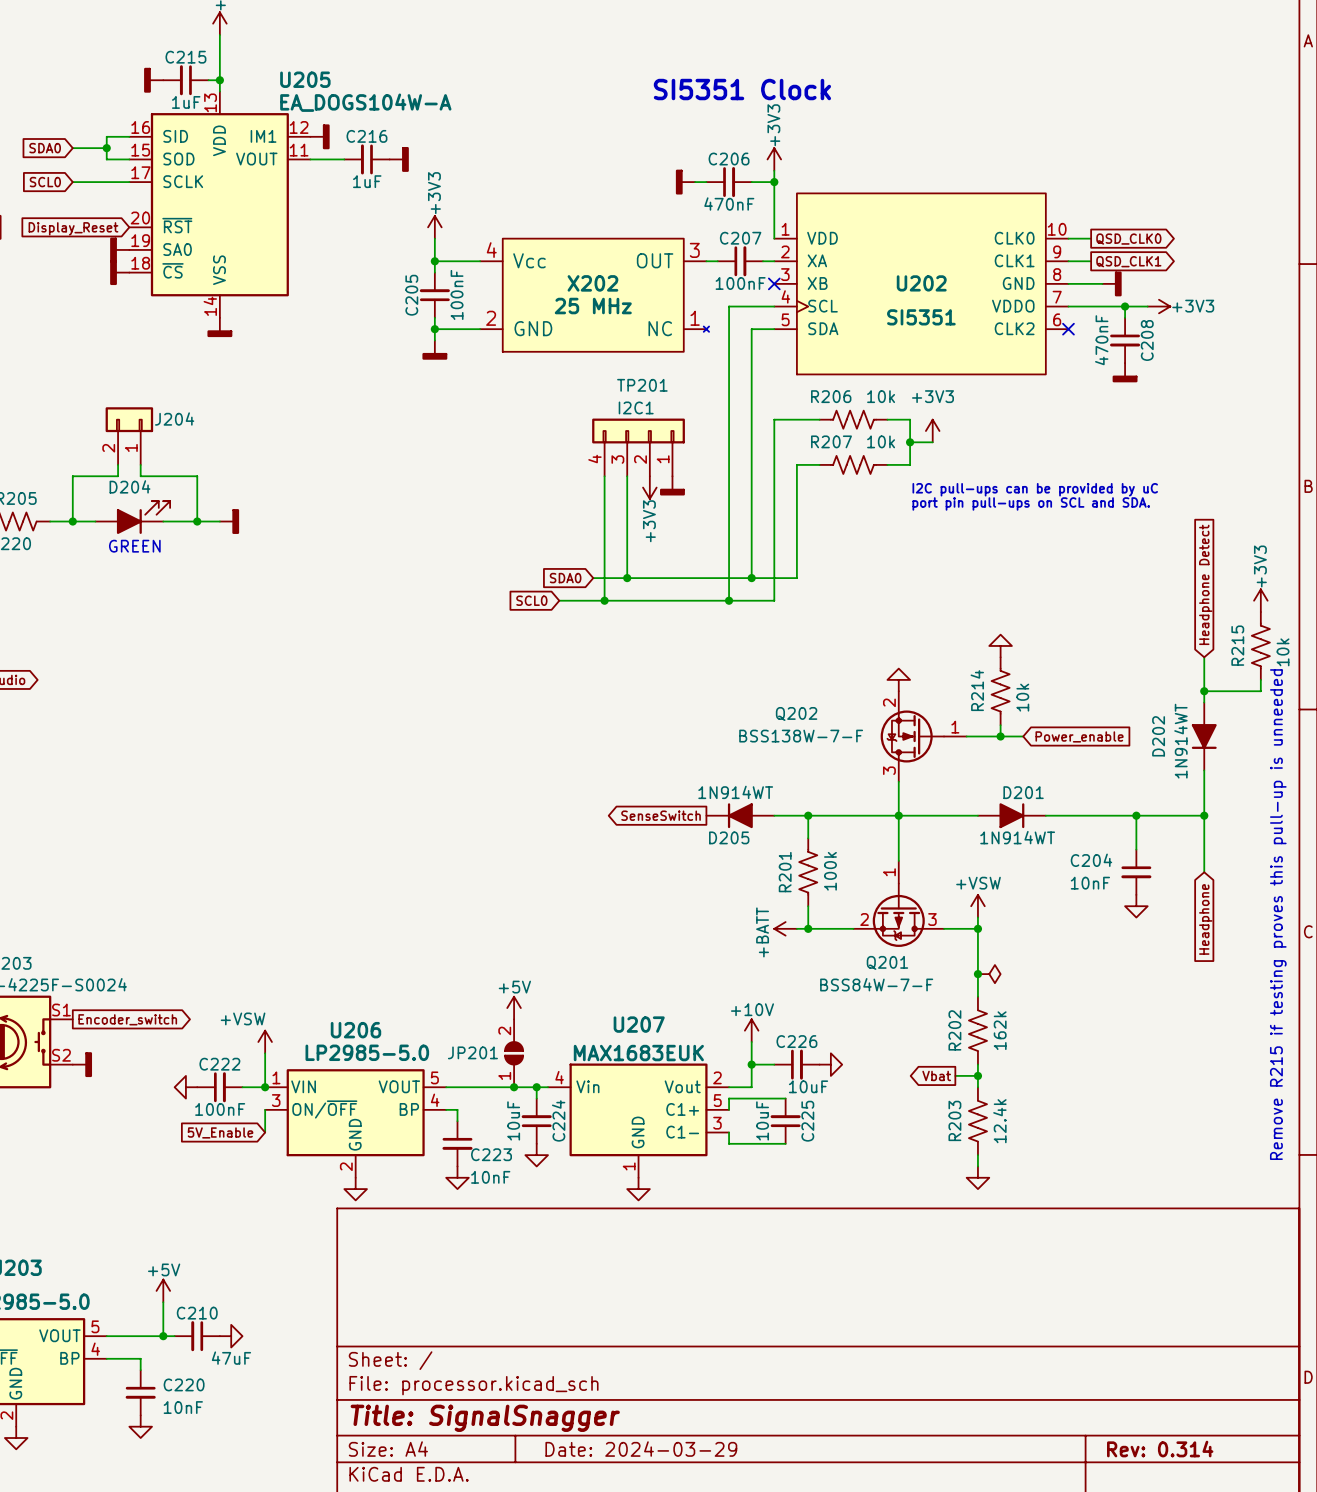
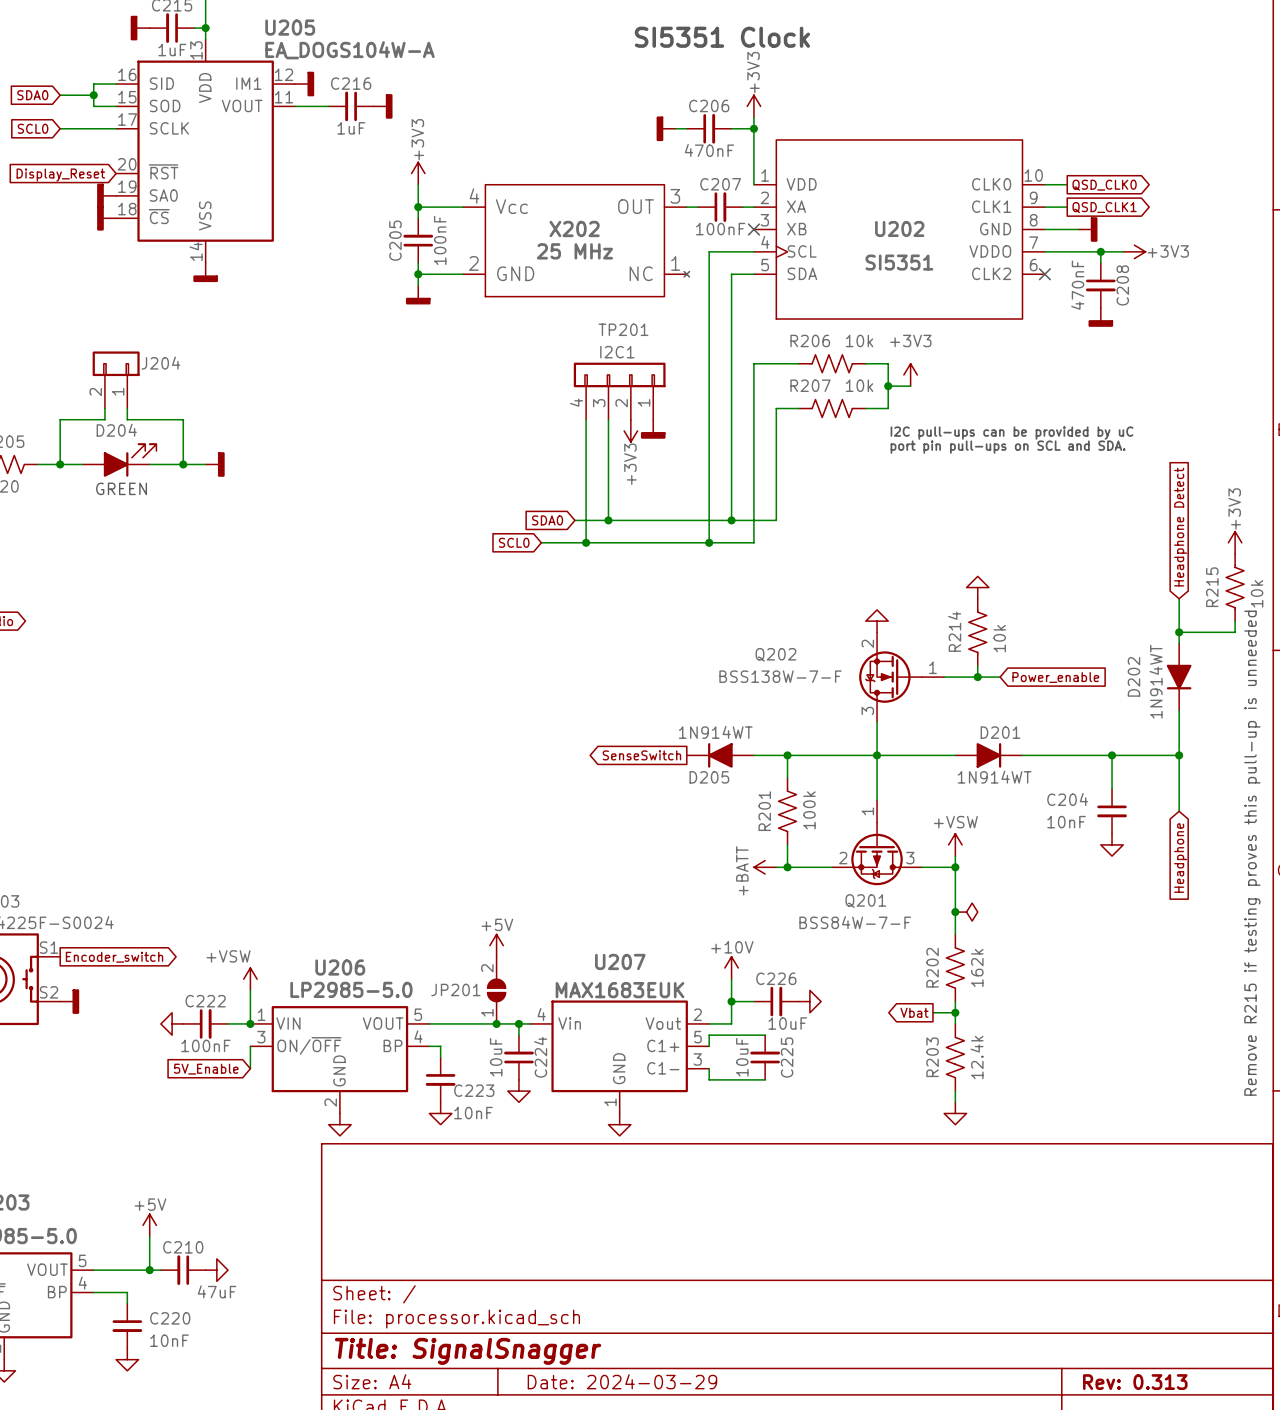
title block: Rev: 0.314 (1160, 1449) -> Rev: 0.313 (1135, 1382)

